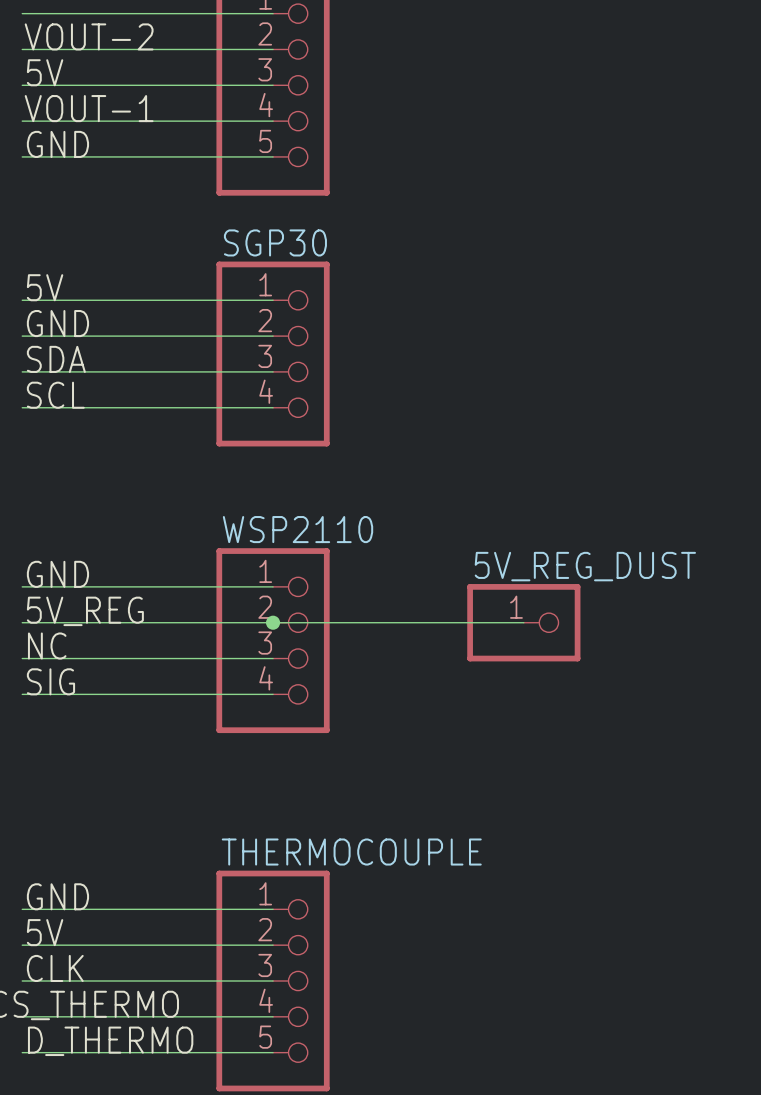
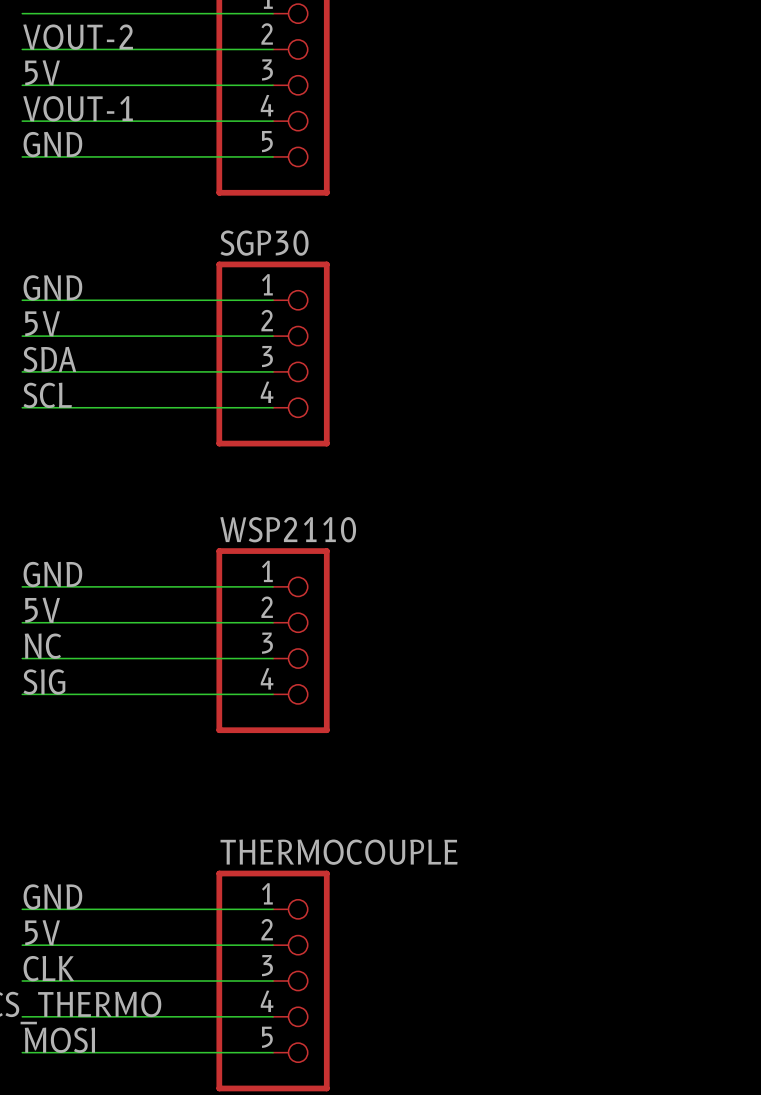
label: 5V (45, 287) -> GND (52, 287)
label: GND (57, 323) -> 5V (42, 323)
label: 5V_REG (85, 611) -> 5V (42, 610)
wire: (273, 622) (523, 622) -> none
junction: (273, 622) -> none
5V_REG_DUST: (523, 622) -> none
label: D_THERMO (110, 1041) -> MOSI (59, 1040)

